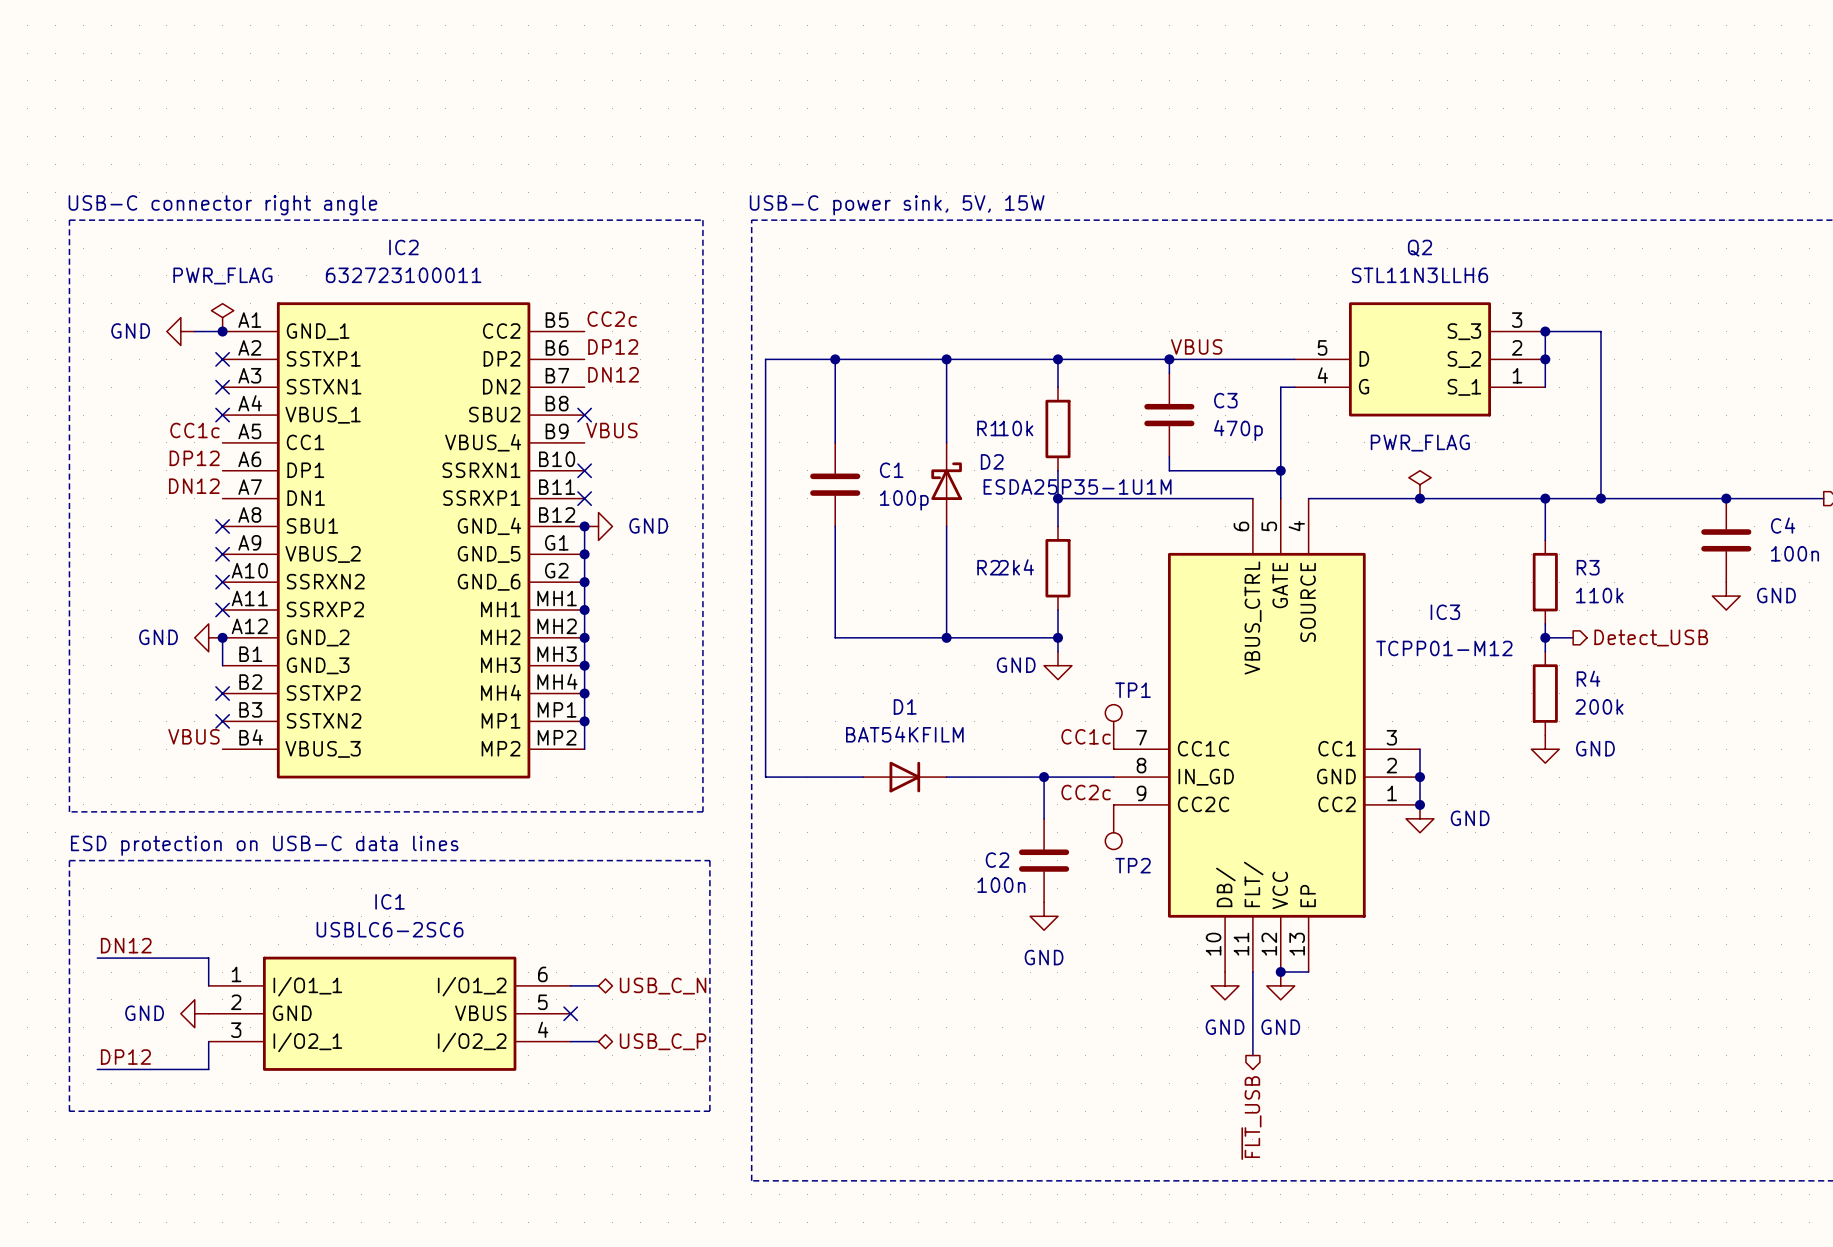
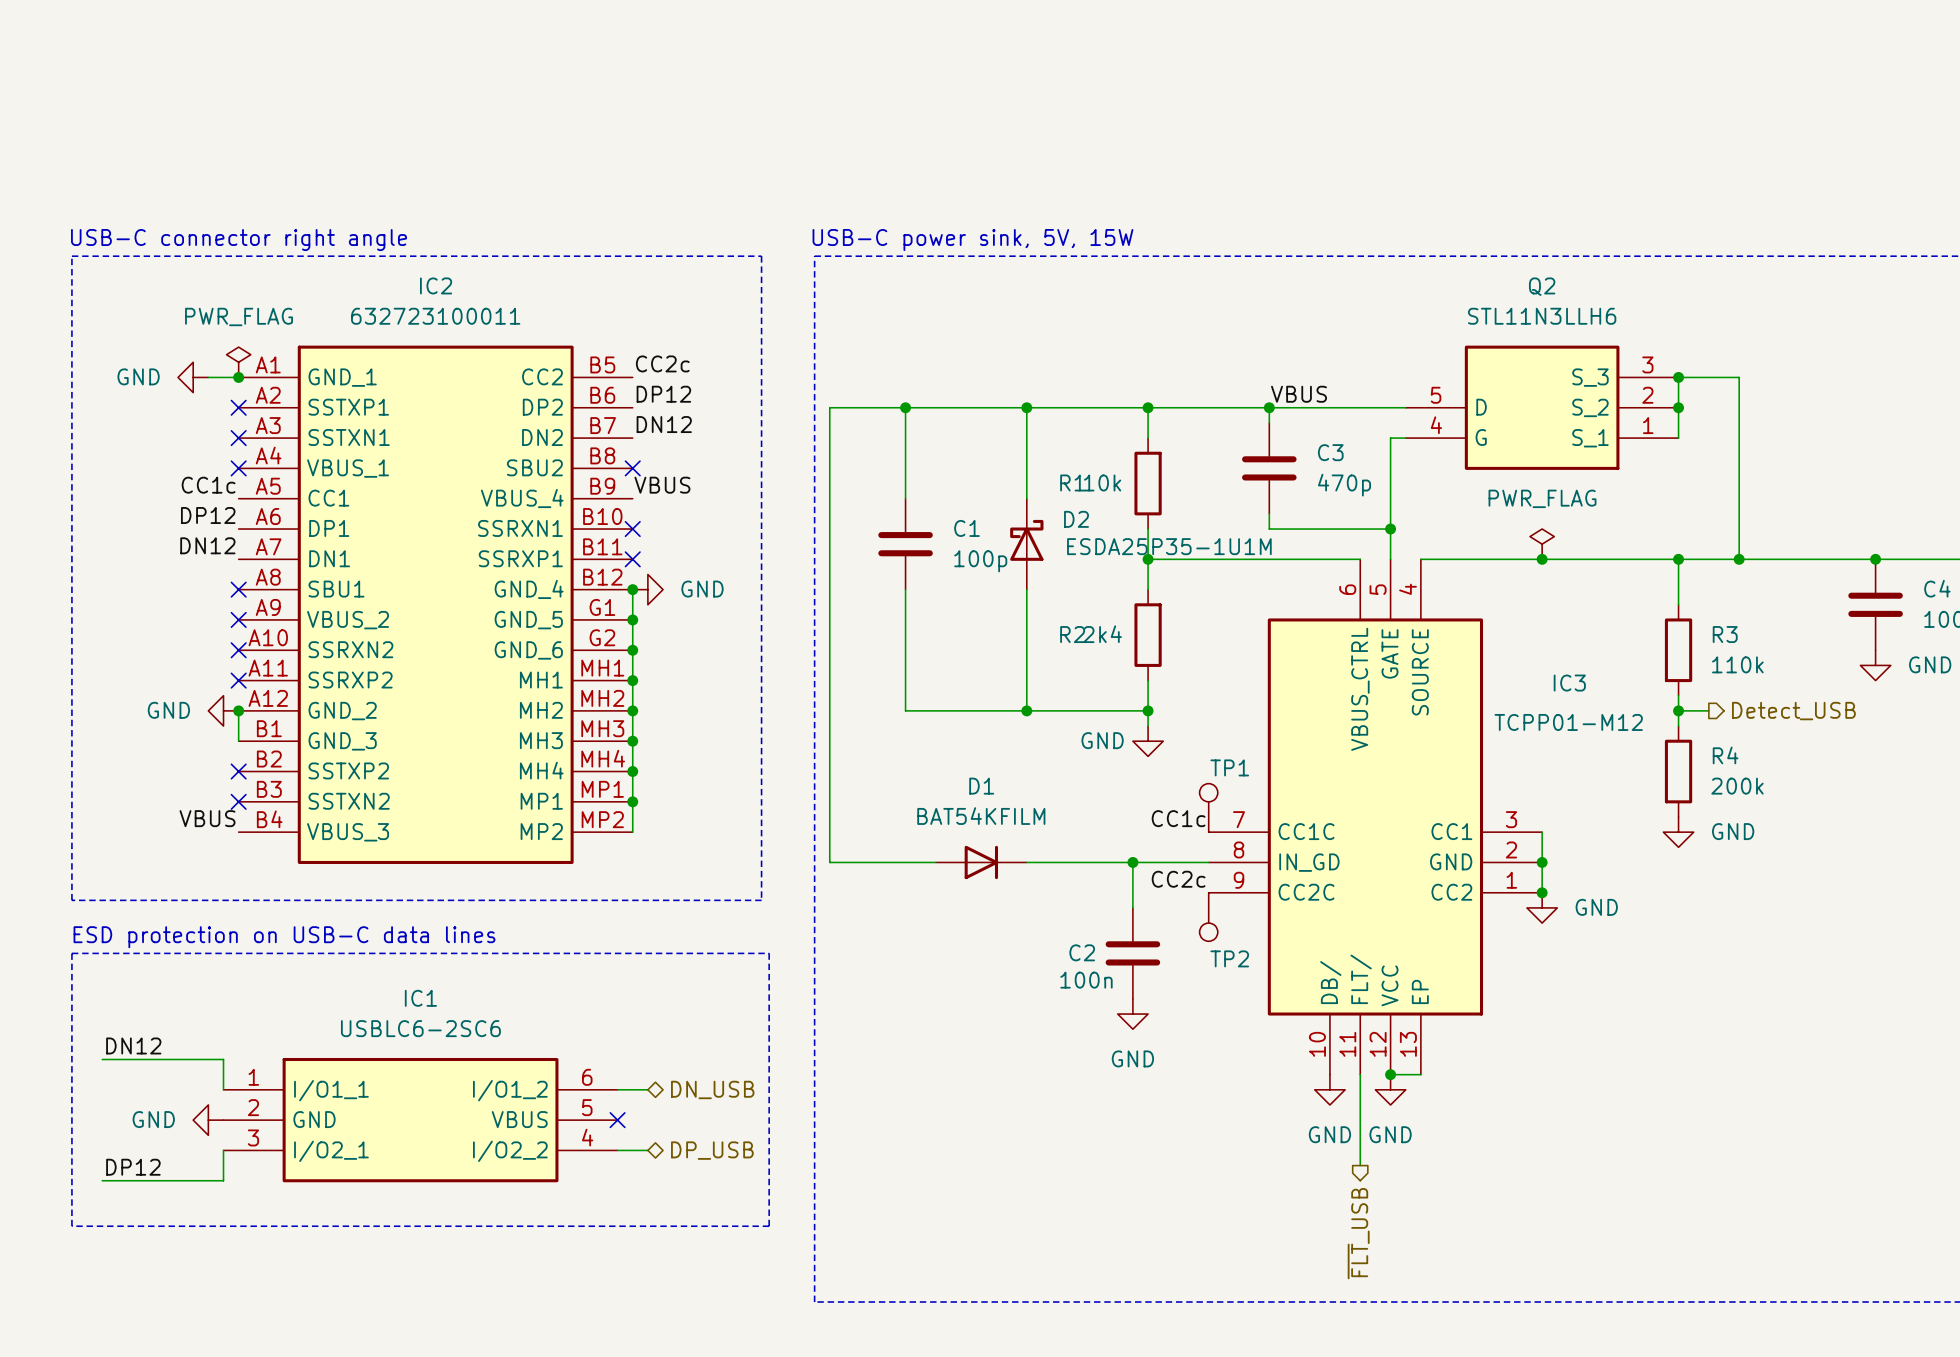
hierarchical label: USB_C_N (663, 986) -> DN_USB (712, 1089)
hierarchical label: USB_C_P (663, 1041) -> DP_USB (712, 1150)

